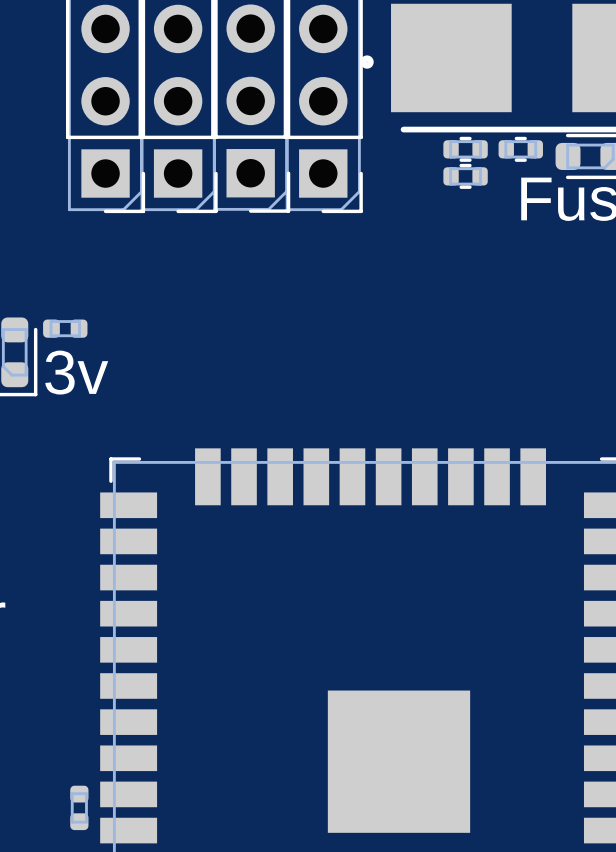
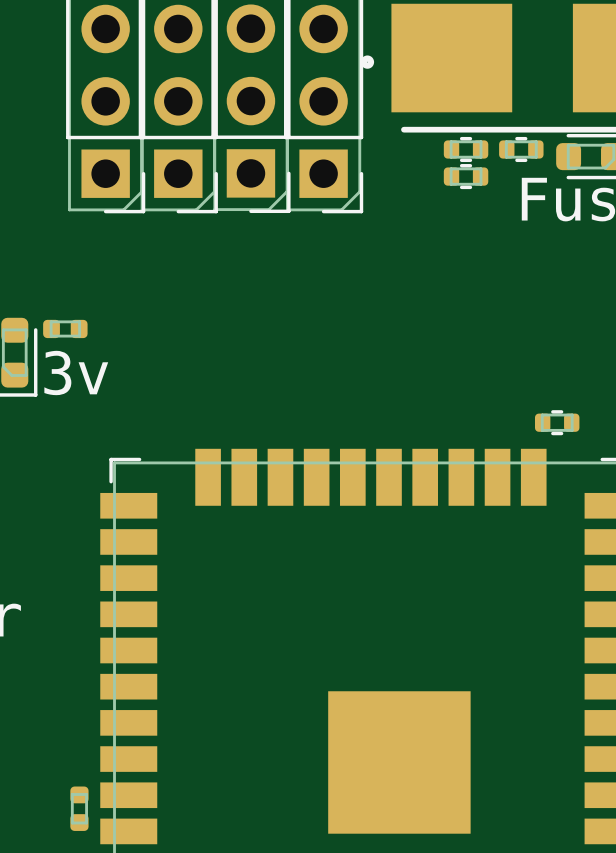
part: none -> (557, 422)

